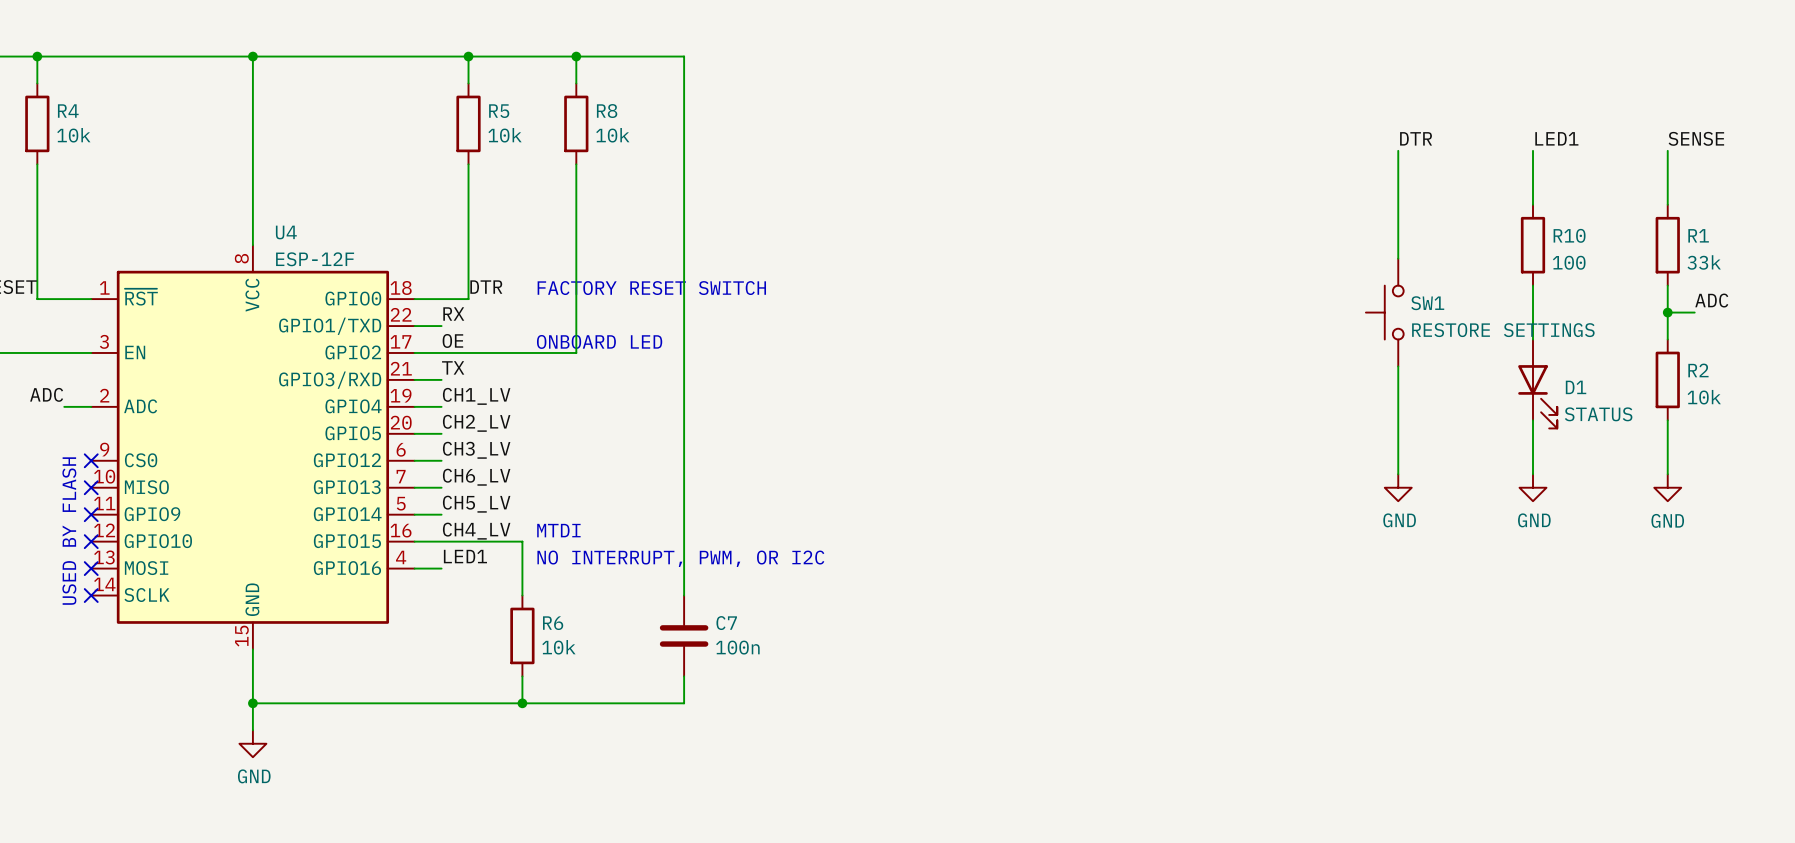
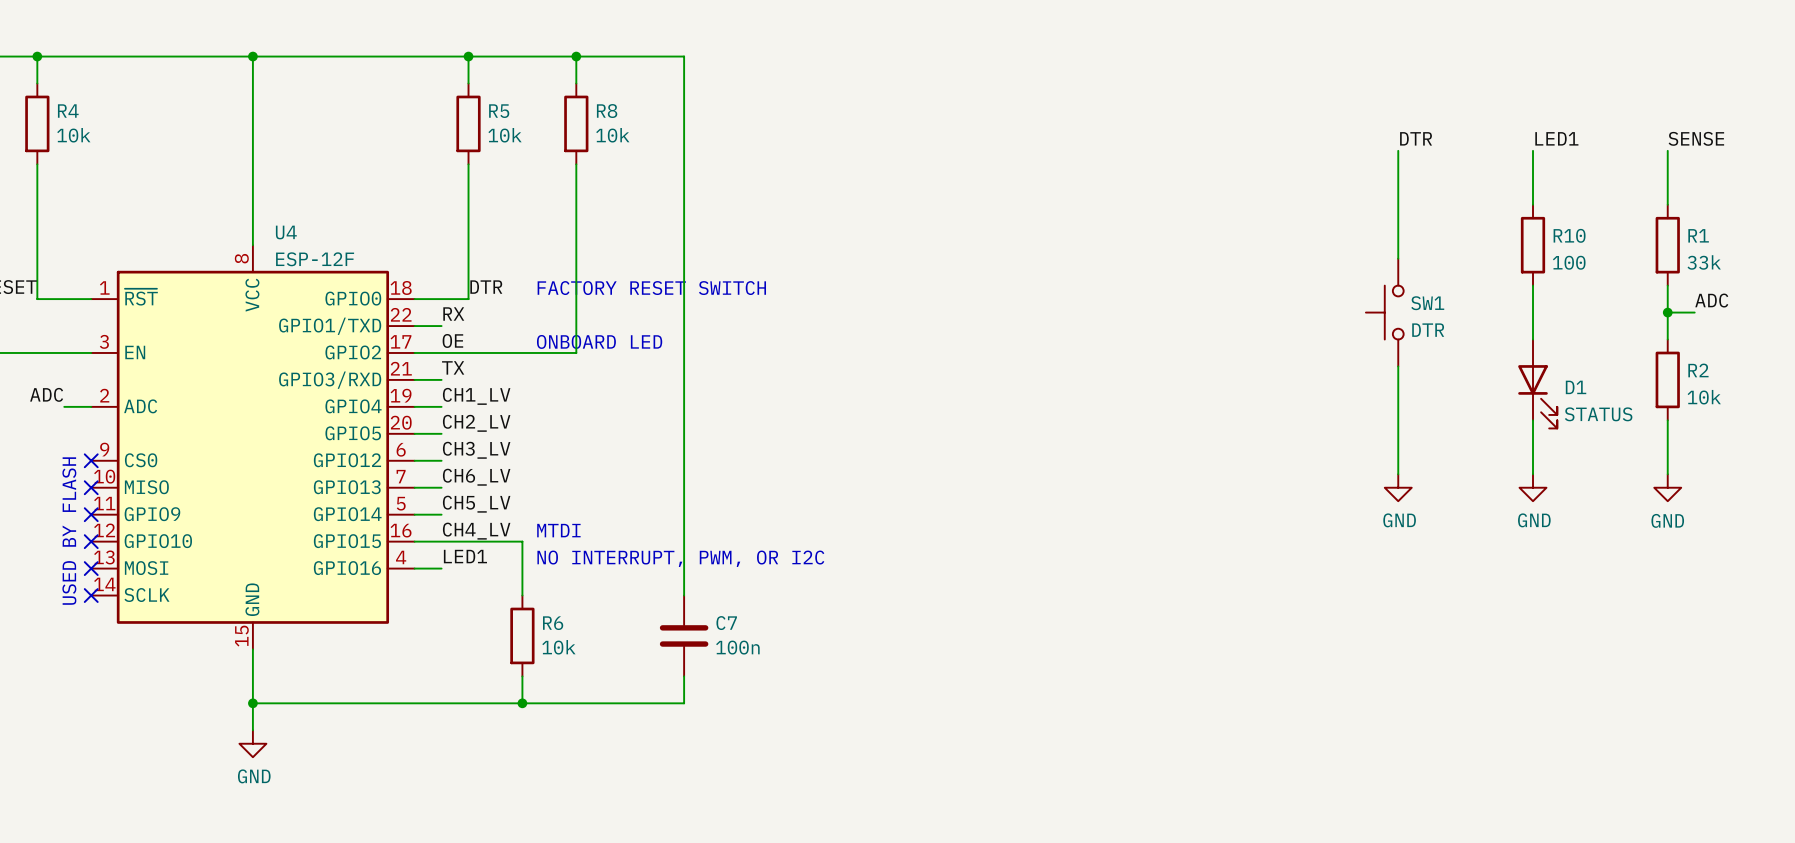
SW1 value: RESTORE SETTINGS (1503, 330) -> DTR (1428, 330)

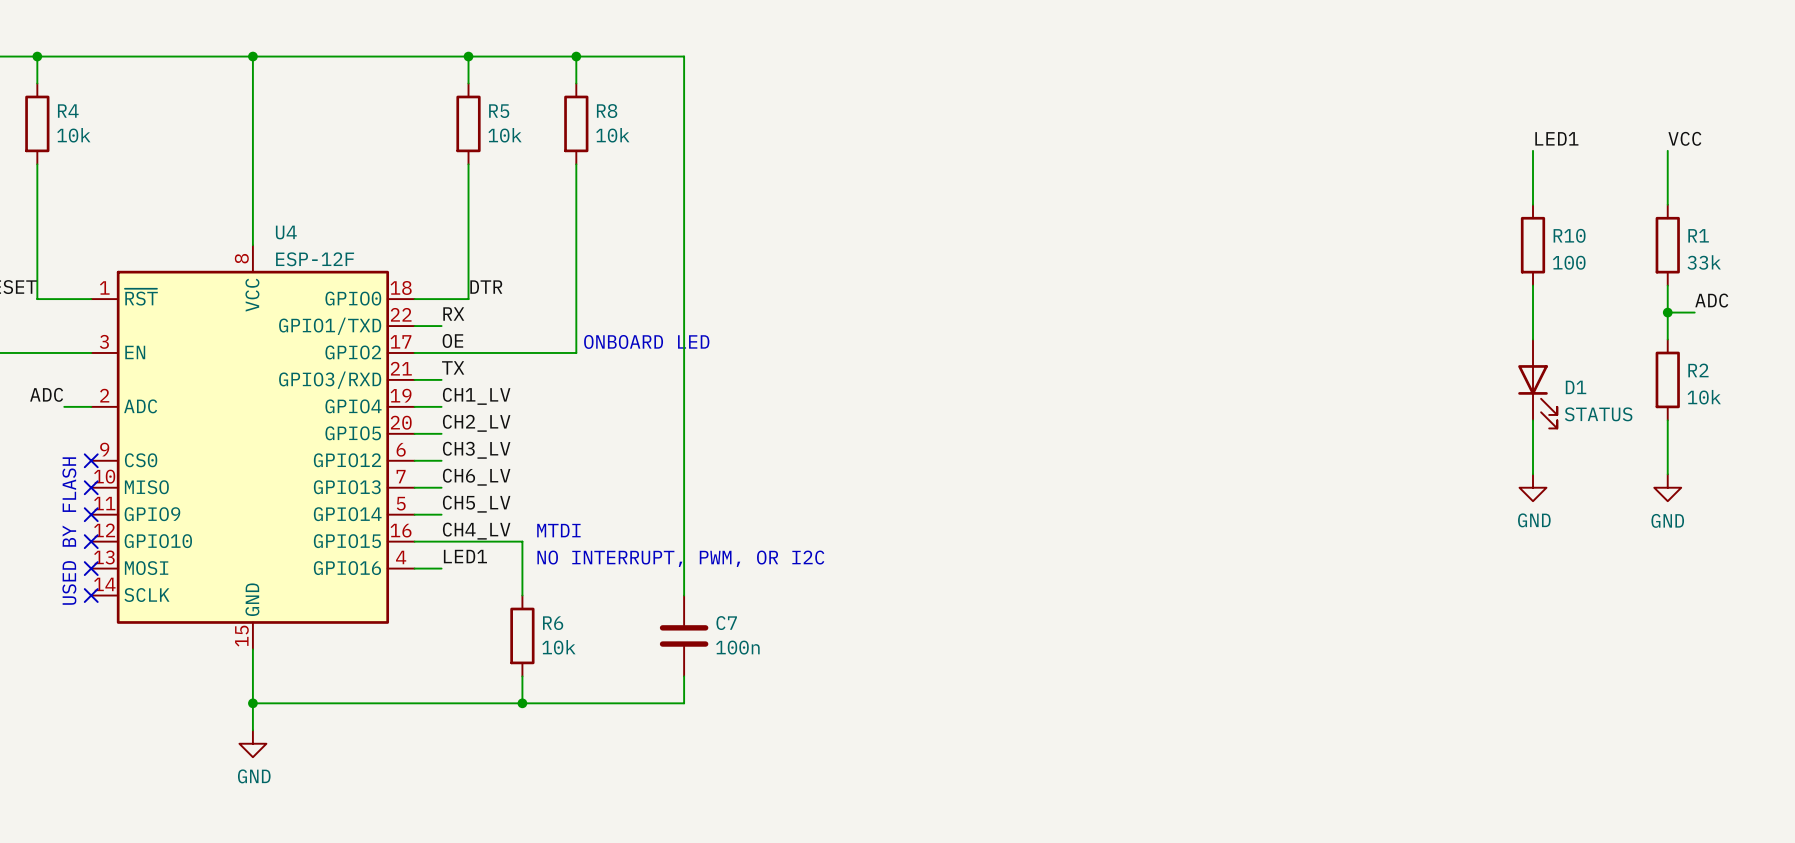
label: DTR (1416, 138) -> none
label: SENSE (1696, 138) -> VCC (1684, 138)
wire: (1398, 150) (1398, 258) -> none
text: FACTORY RESET SWITCH (651, 288) -> none
SW1: DTR (1384, 312) -> none
text position: ONBOARD LED (599, 341) -> ONBOARD LED (646, 341)
wire: (1398, 366) (1398, 474) -> none
power symbol: GND (1398, 487) -> none

